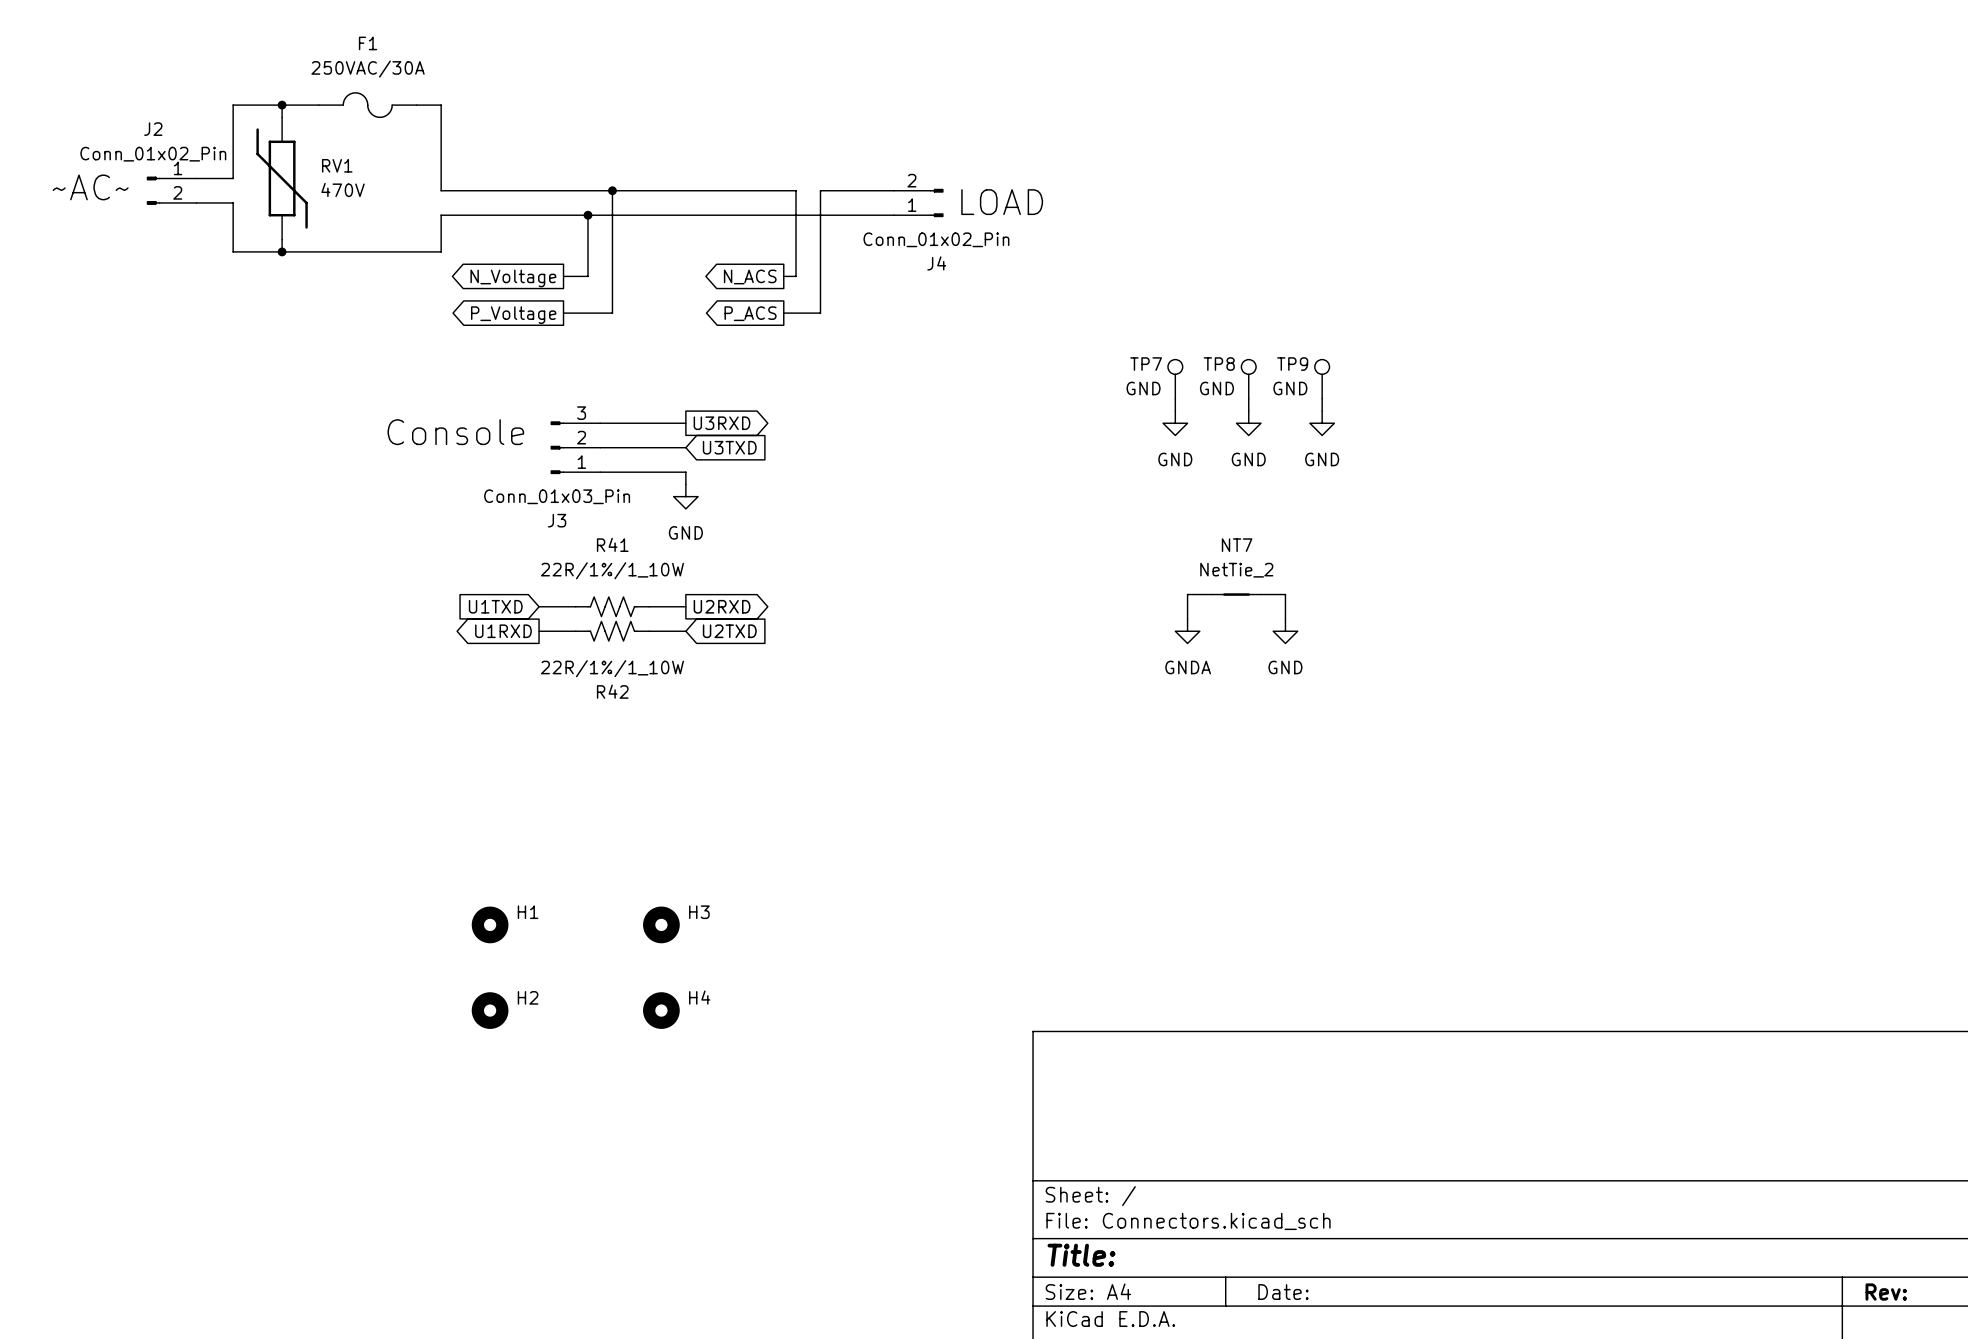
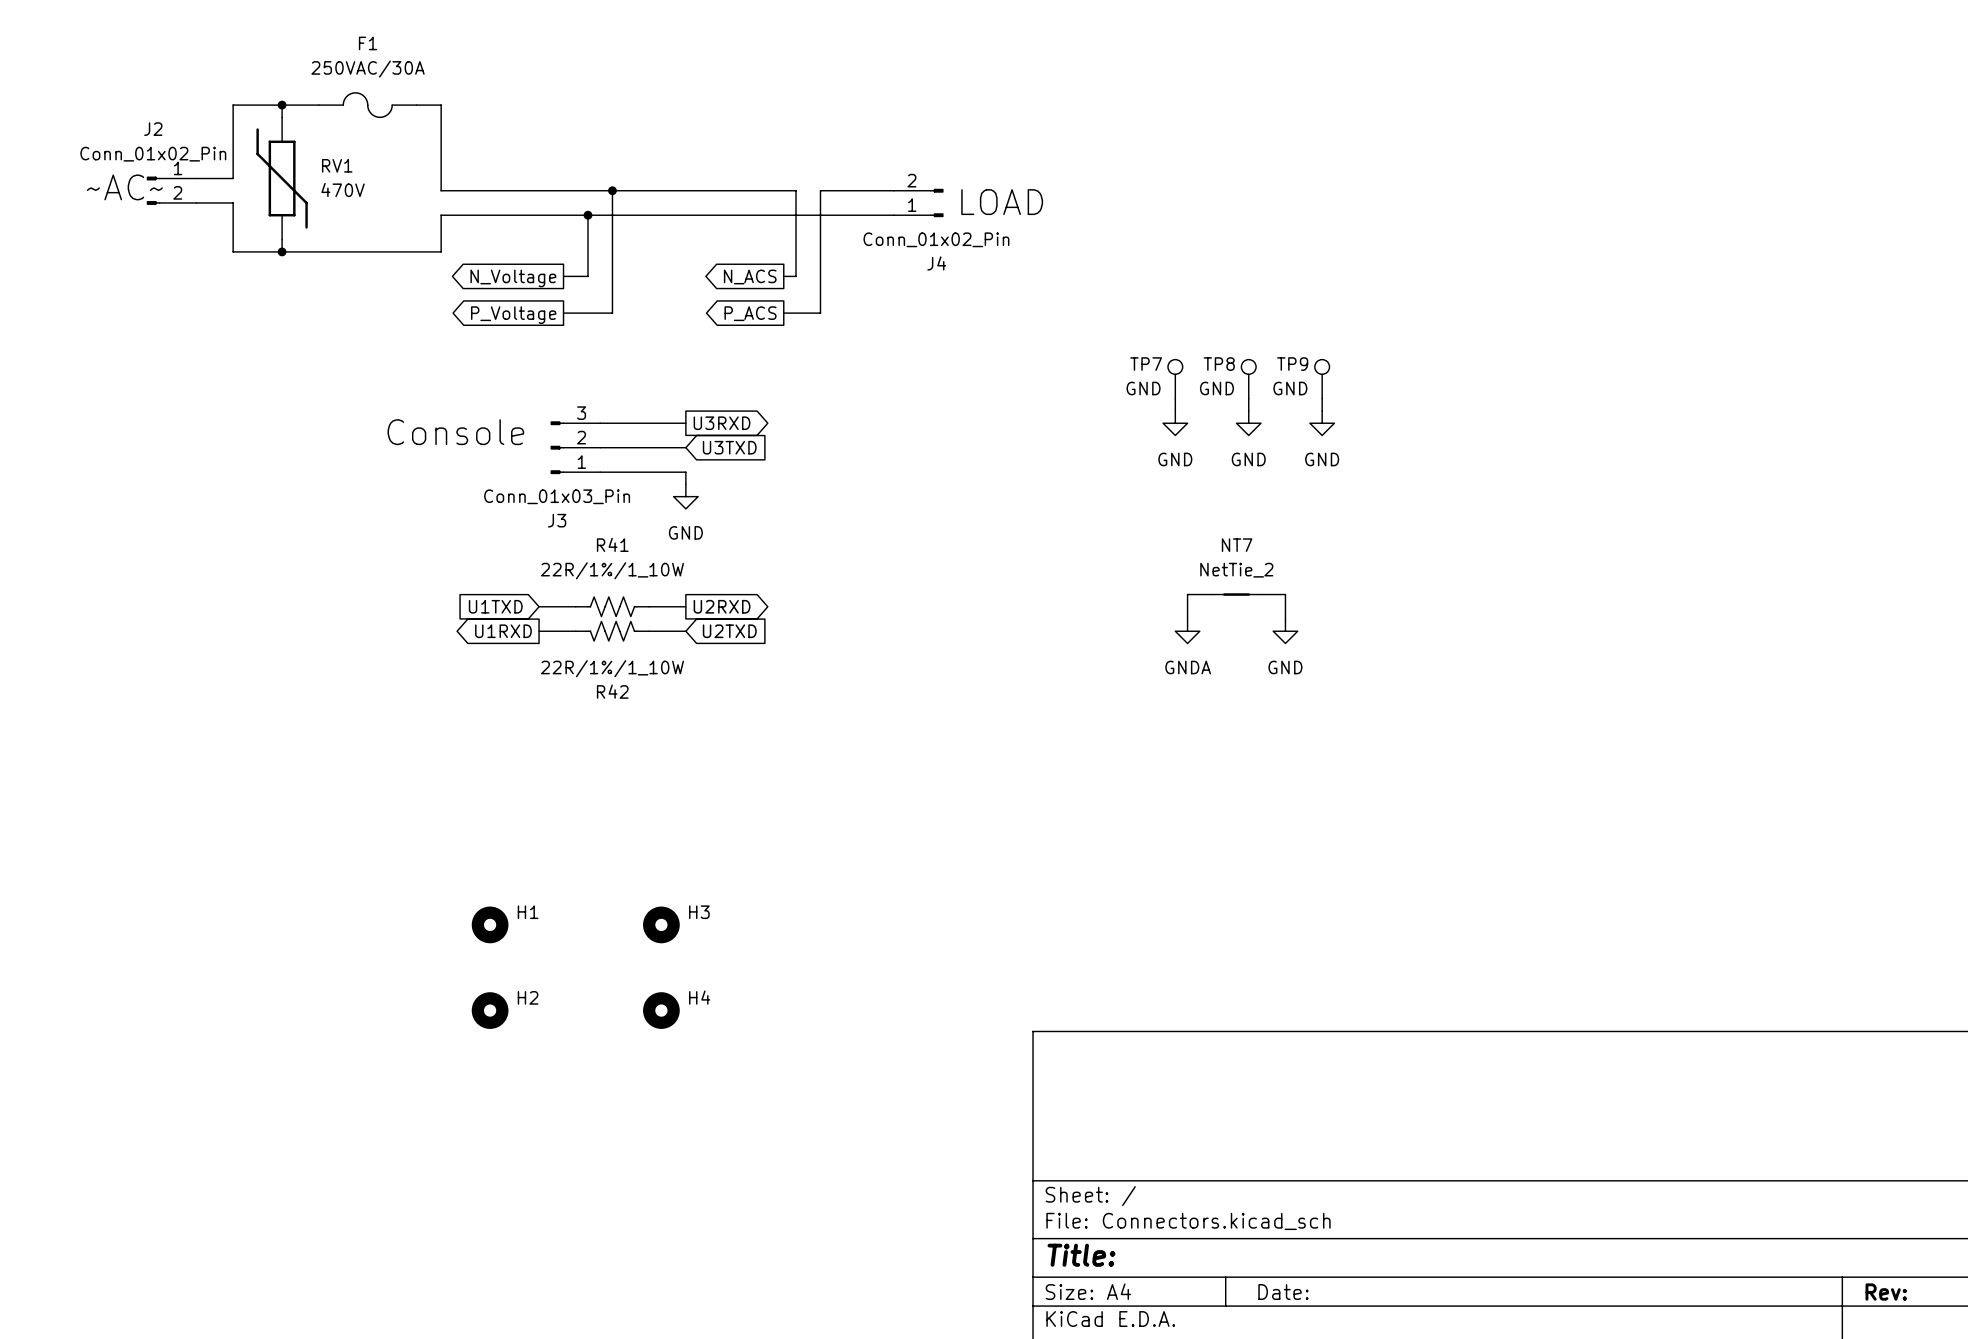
text position: ~AC~ (90, 187) -> ~AC~ (124, 187)

